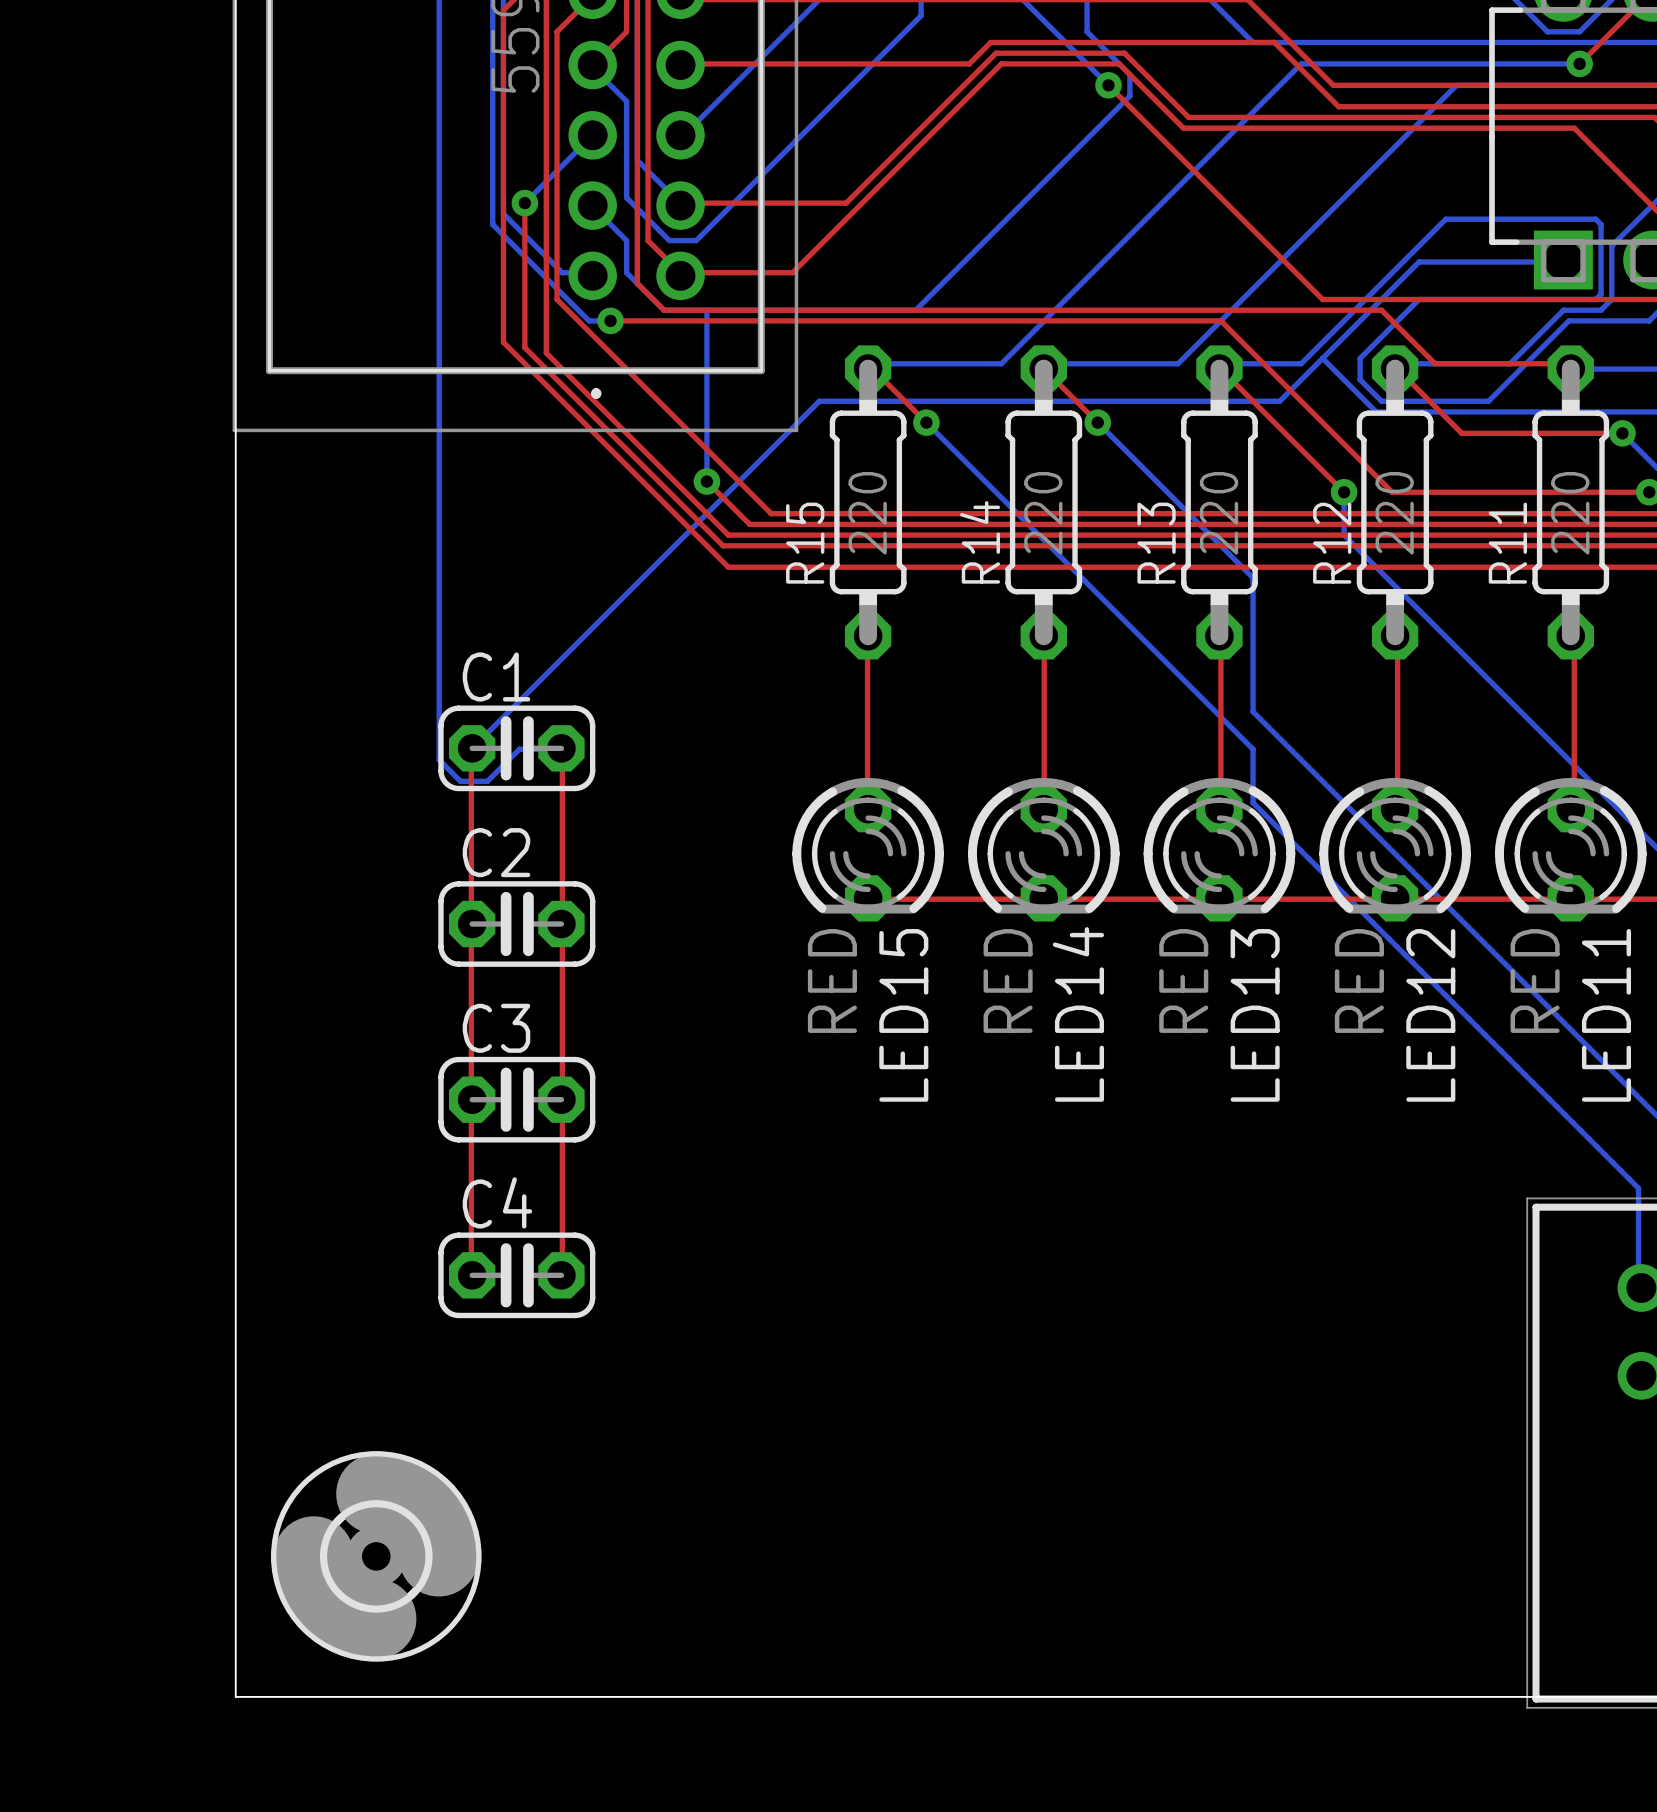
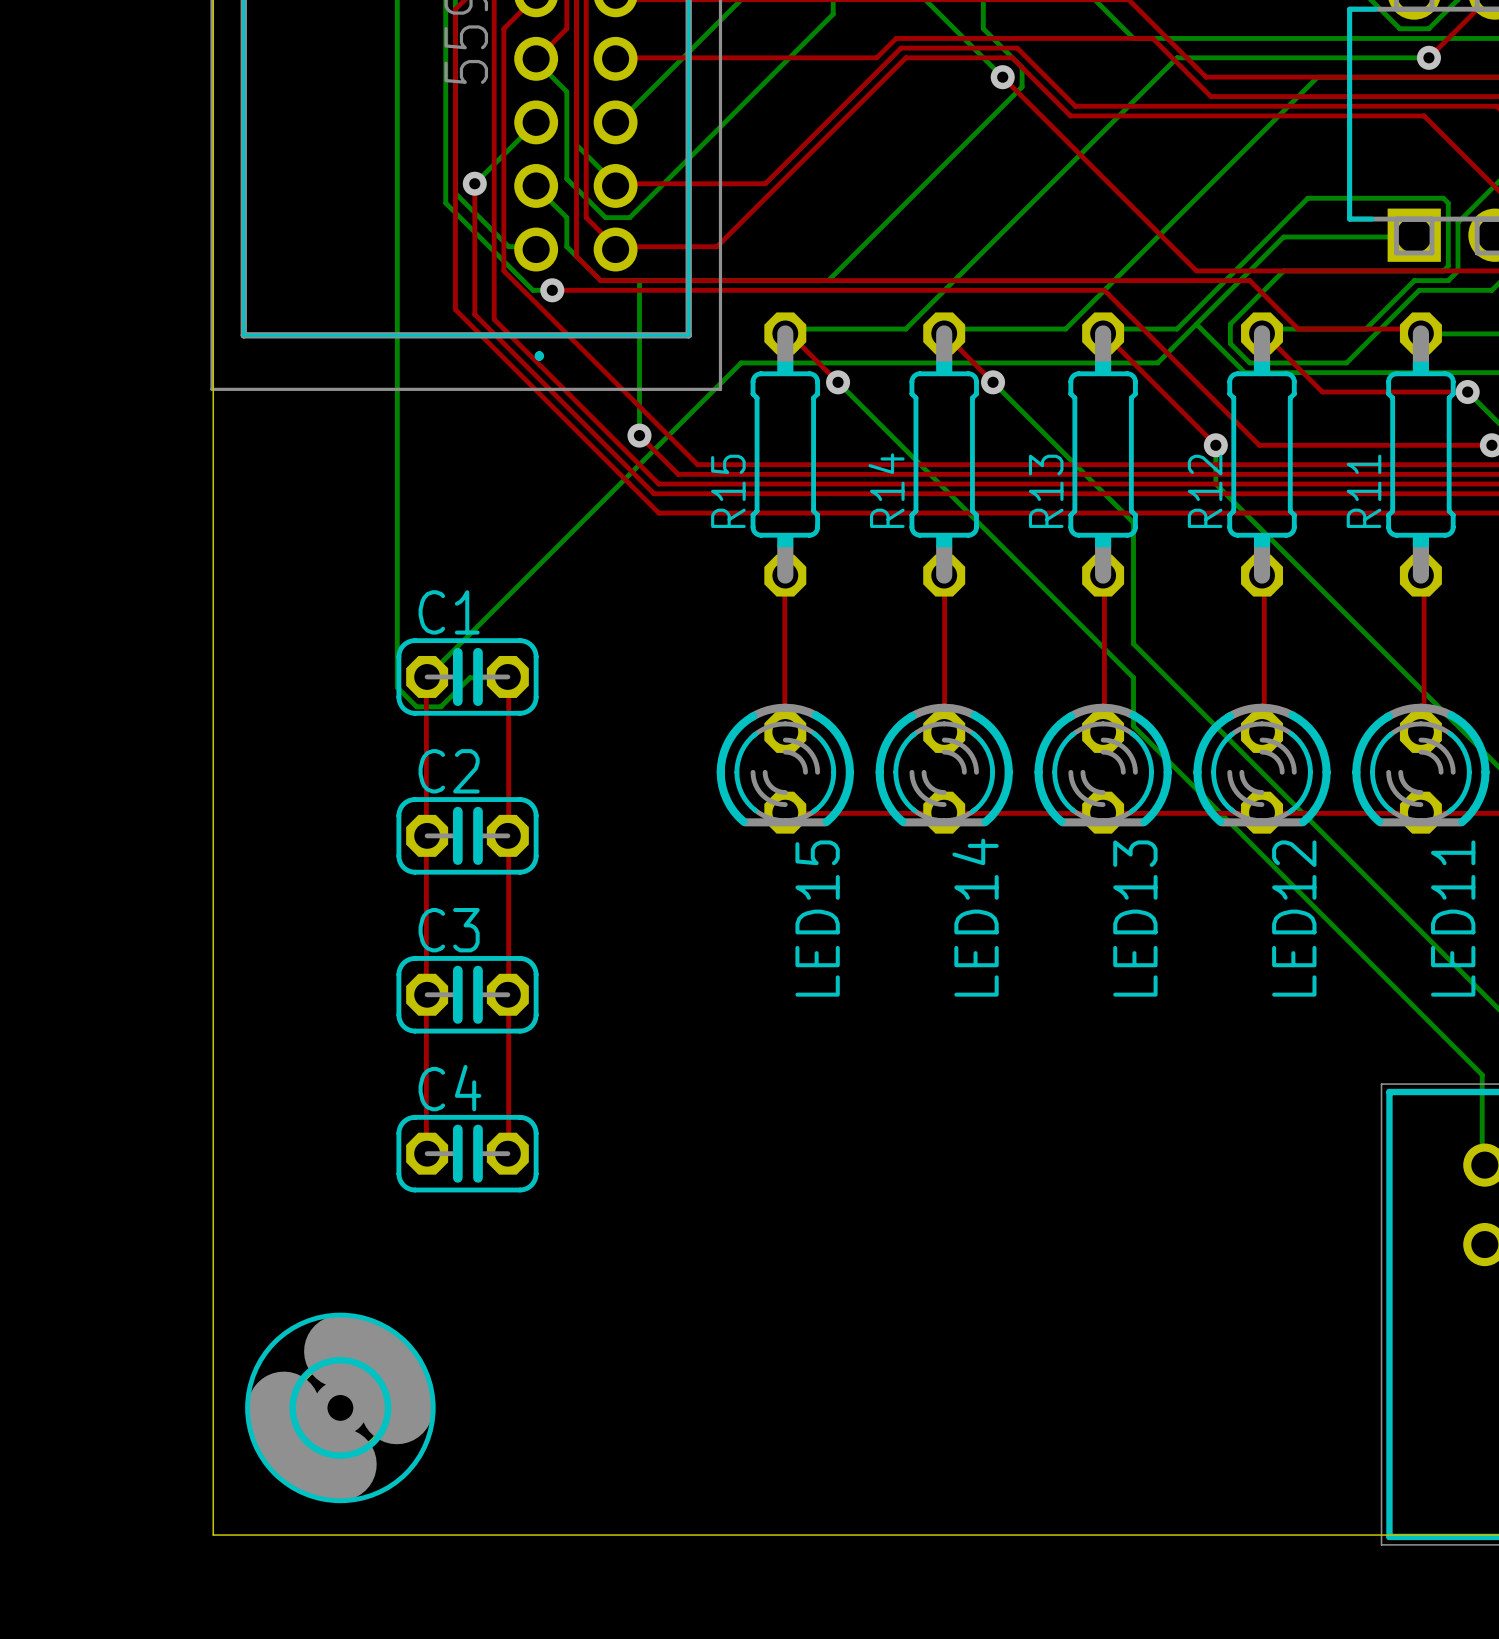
R15 value: 220 (867, 513) -> none
R14 value: 220 (1043, 513) -> none
R13 value: 220 (1219, 513) -> none
R12 value: 220 (1394, 513) -> none
R11 value: 220 (1570, 513) -> none
LED15 value: RED (832, 980) -> none
LED14 value: RED (1008, 980) -> none
LED13 value: RED (1183, 980) -> none
LED12 value: RED (1359, 980) -> none
LED11 value: RED (1535, 980) -> none

